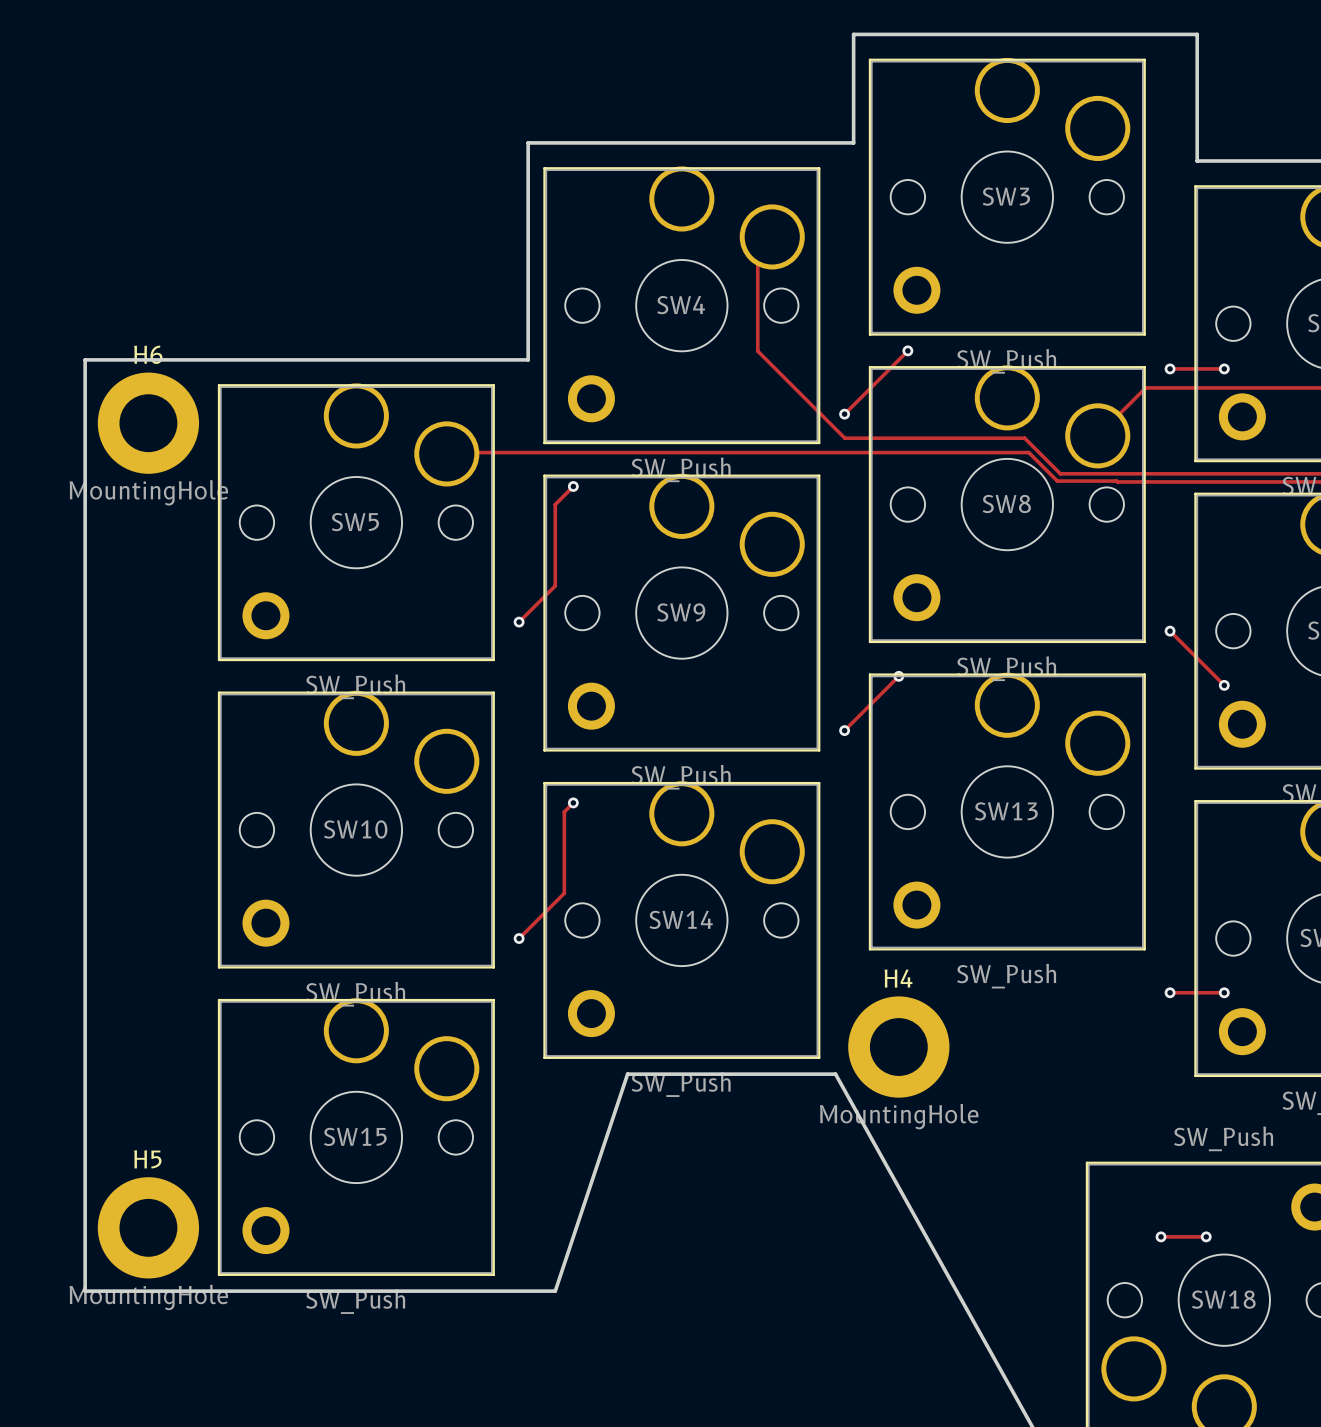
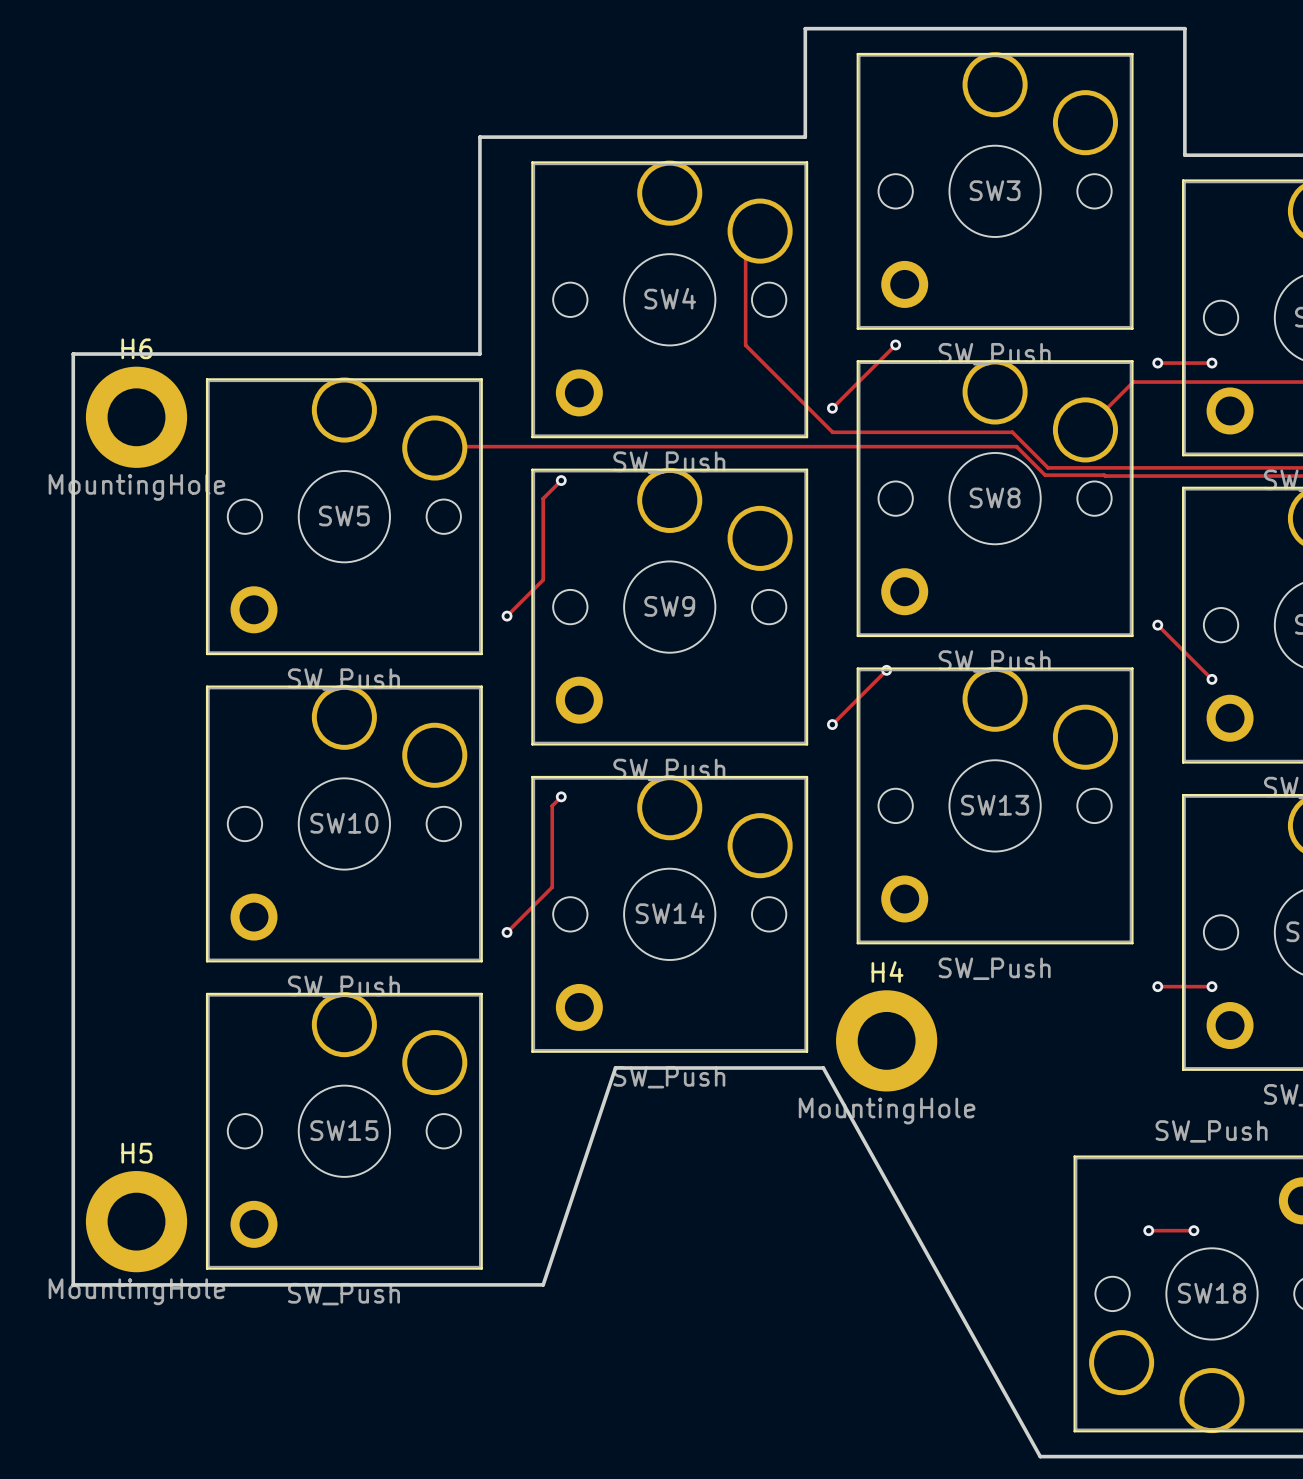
board edge: (853, 34) (853, 142) (817, 142) -> (841, 28) (805, 28) (805, 137)
board edge: (528, 142) (528, 359) (491, 359) -> (516, 137) (479, 137) (479, 354)

